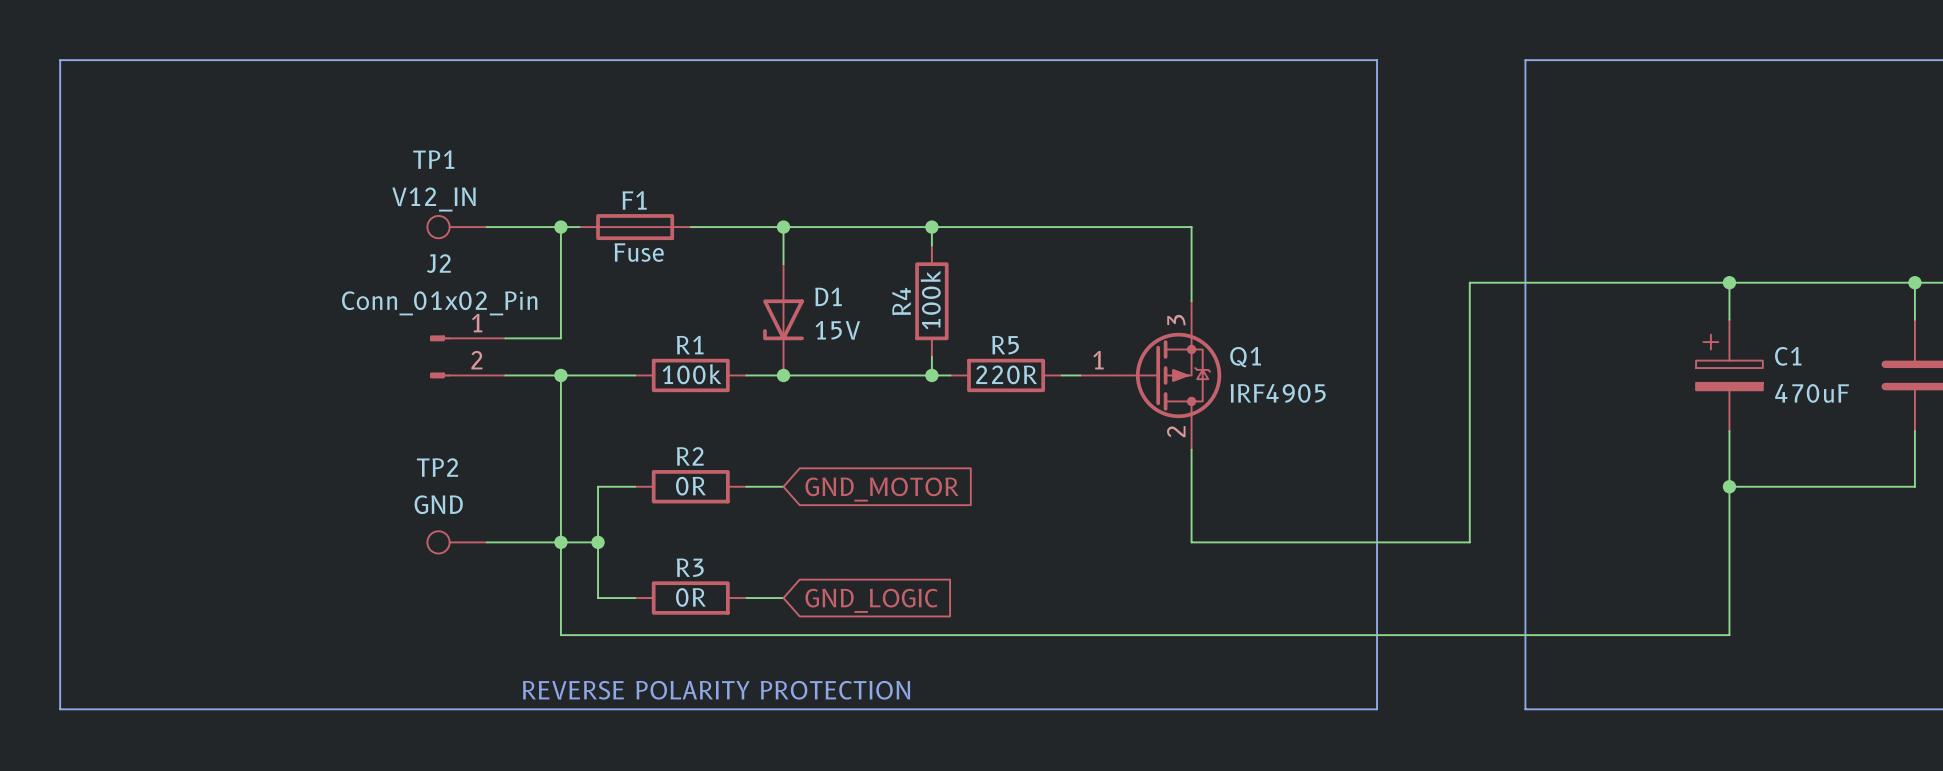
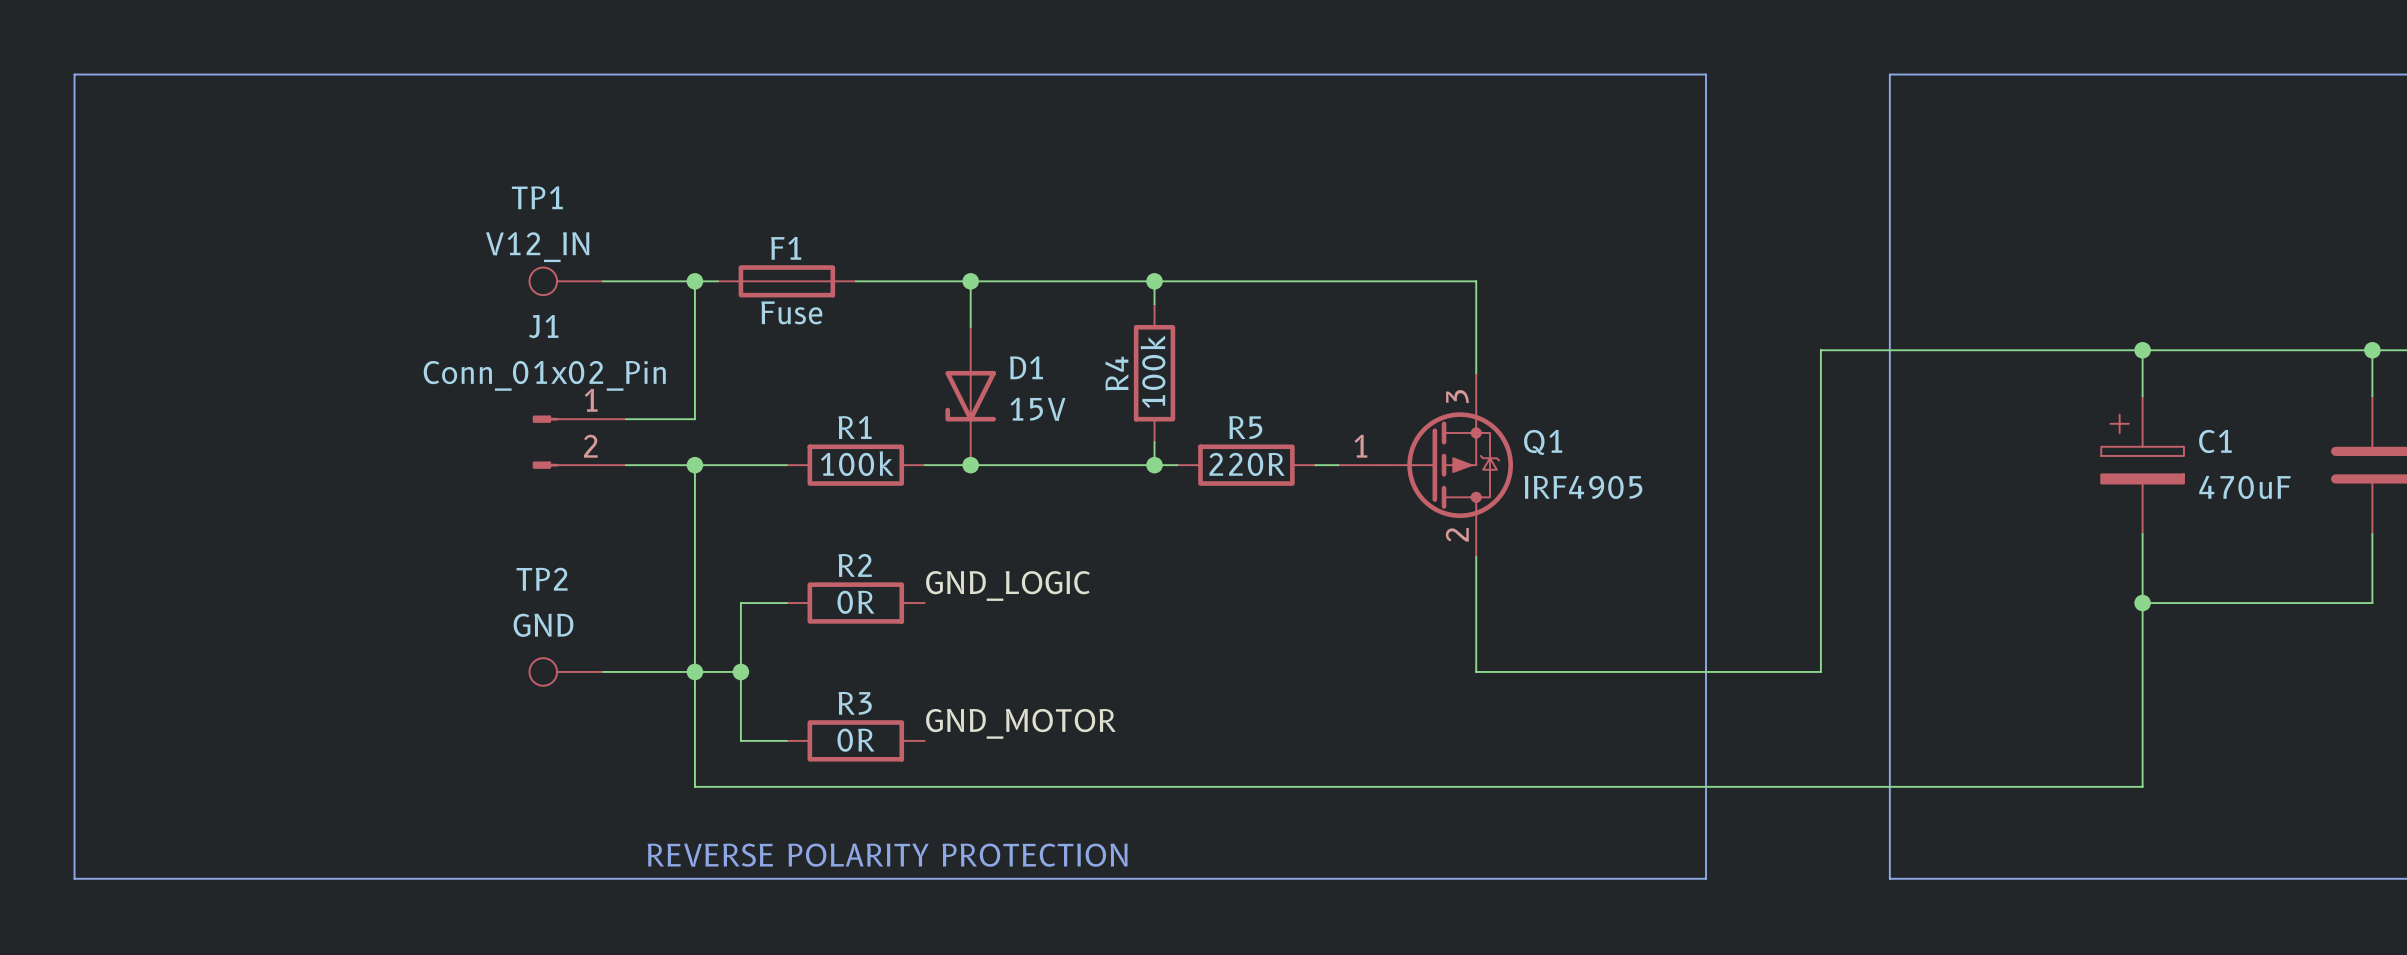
J2 name: J2 (438, 263) -> J1 (543, 326)
label: none -> GND_LOGIC (1007, 585)
wire: (746, 486) (783, 486) -> none
global label: GND_MOTOR (881, 489) -> none
label: none -> GND_MOTOR (1020, 723)
wire: (746, 598) (783, 598) -> none
global label: GND_LOGIC (871, 600) -> none

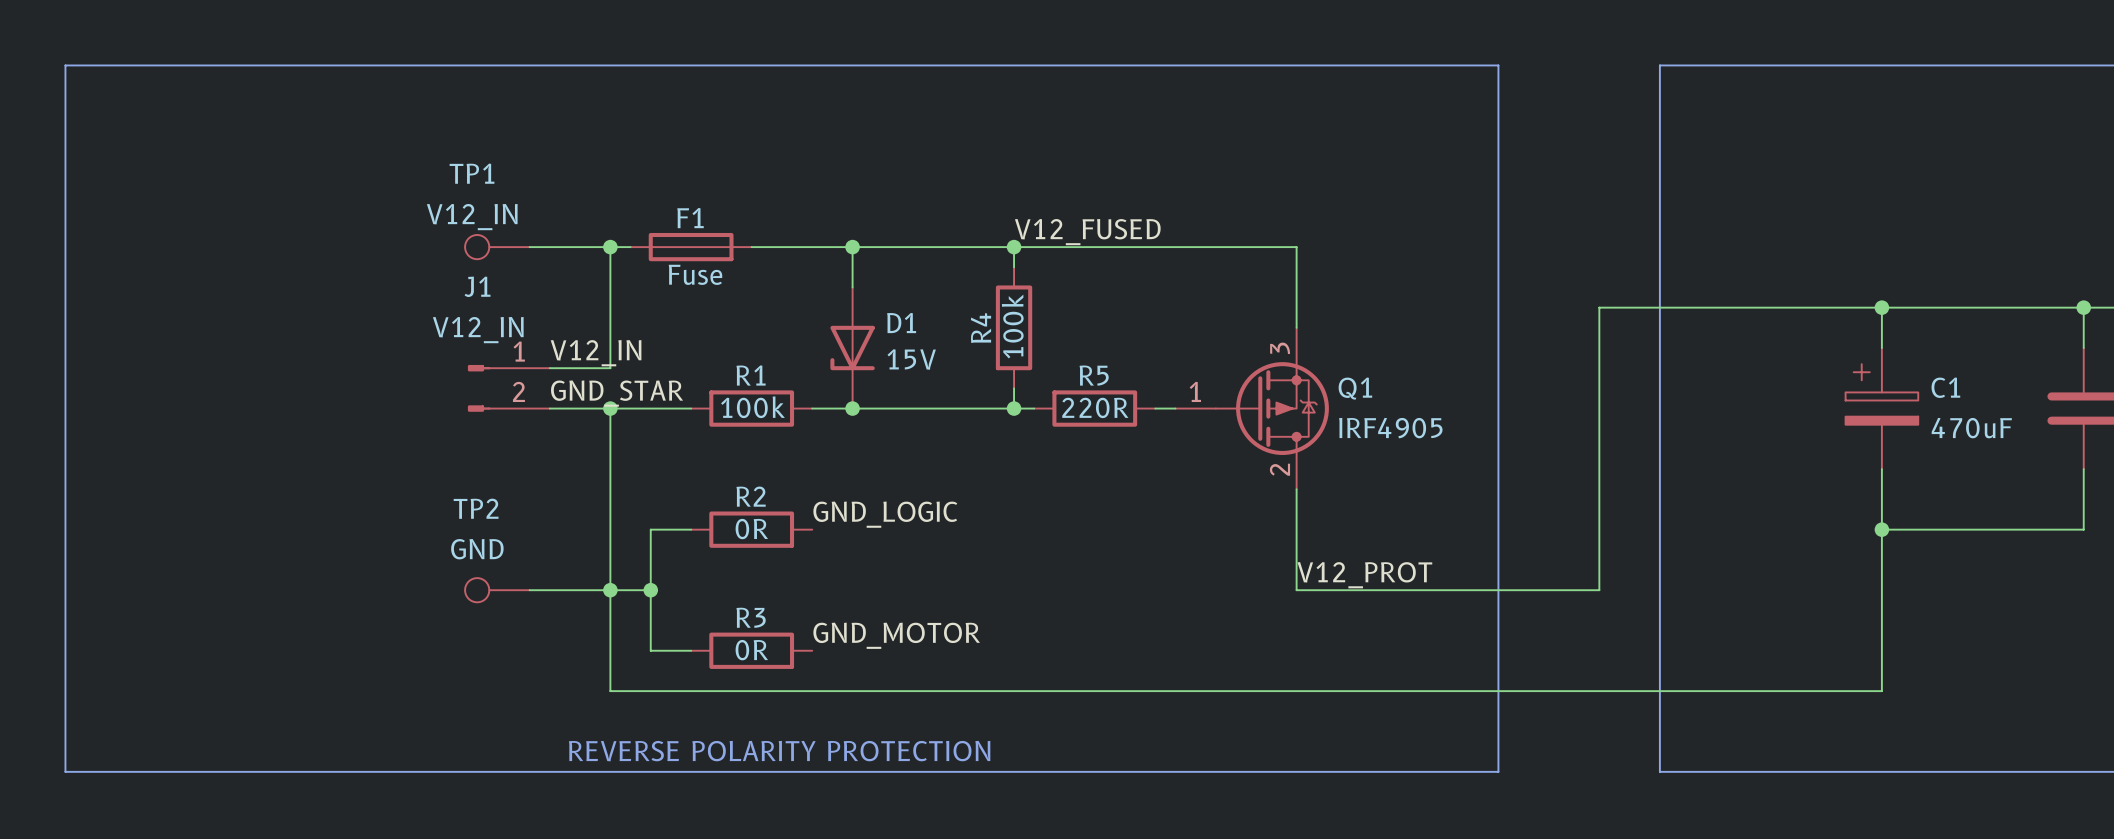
label: none -> V12_FUSED (1087, 232)
J1 value: Conn_01x02_Pin (544, 375) -> V12_IN (478, 330)
label: none -> V12_IN (596, 353)
label: none -> GND_STAR (617, 393)
label: none -> V12_PROT (1364, 575)

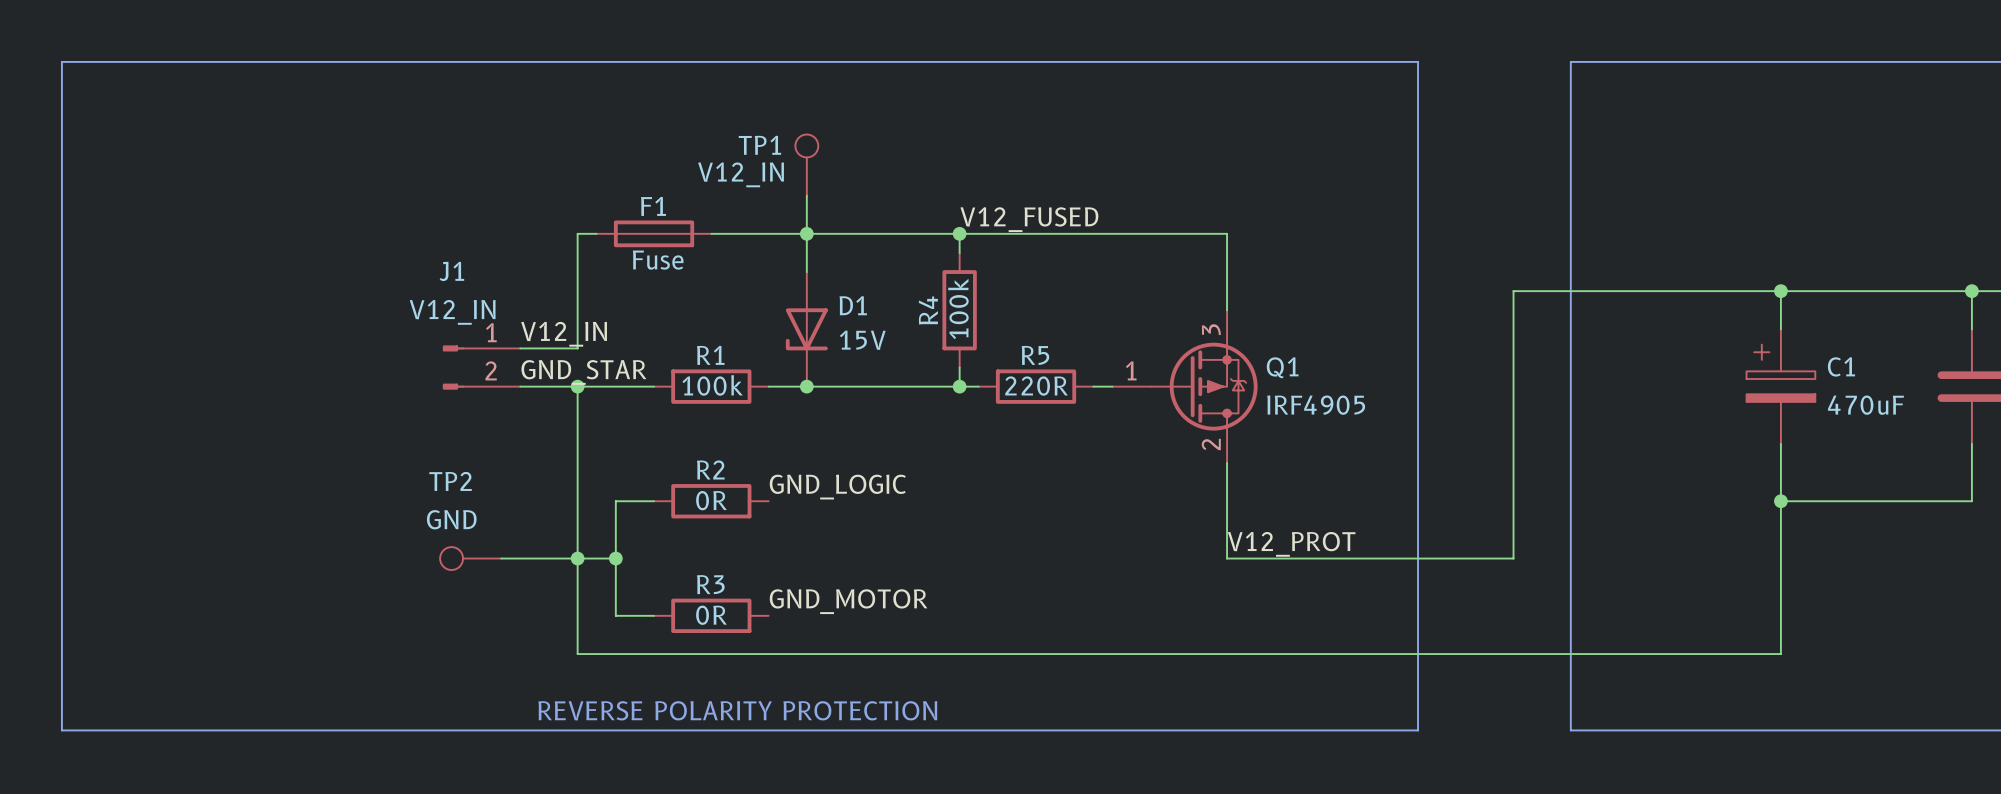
TP1 name position: TP1 (472, 173) -> TP1 (759, 145)
wire: none -> (806, 195) (806, 233)
TP1 value position: V12_IN (472, 217) -> V12_IN (741, 174)
TP1 rotation: 0° (477, 247) -> 90° clockwise (806, 145)
TP1 position: (497, 247) -> (806, 165)
wire: (529, 247) (610, 247) -> none
junction: (610, 247) -> none

